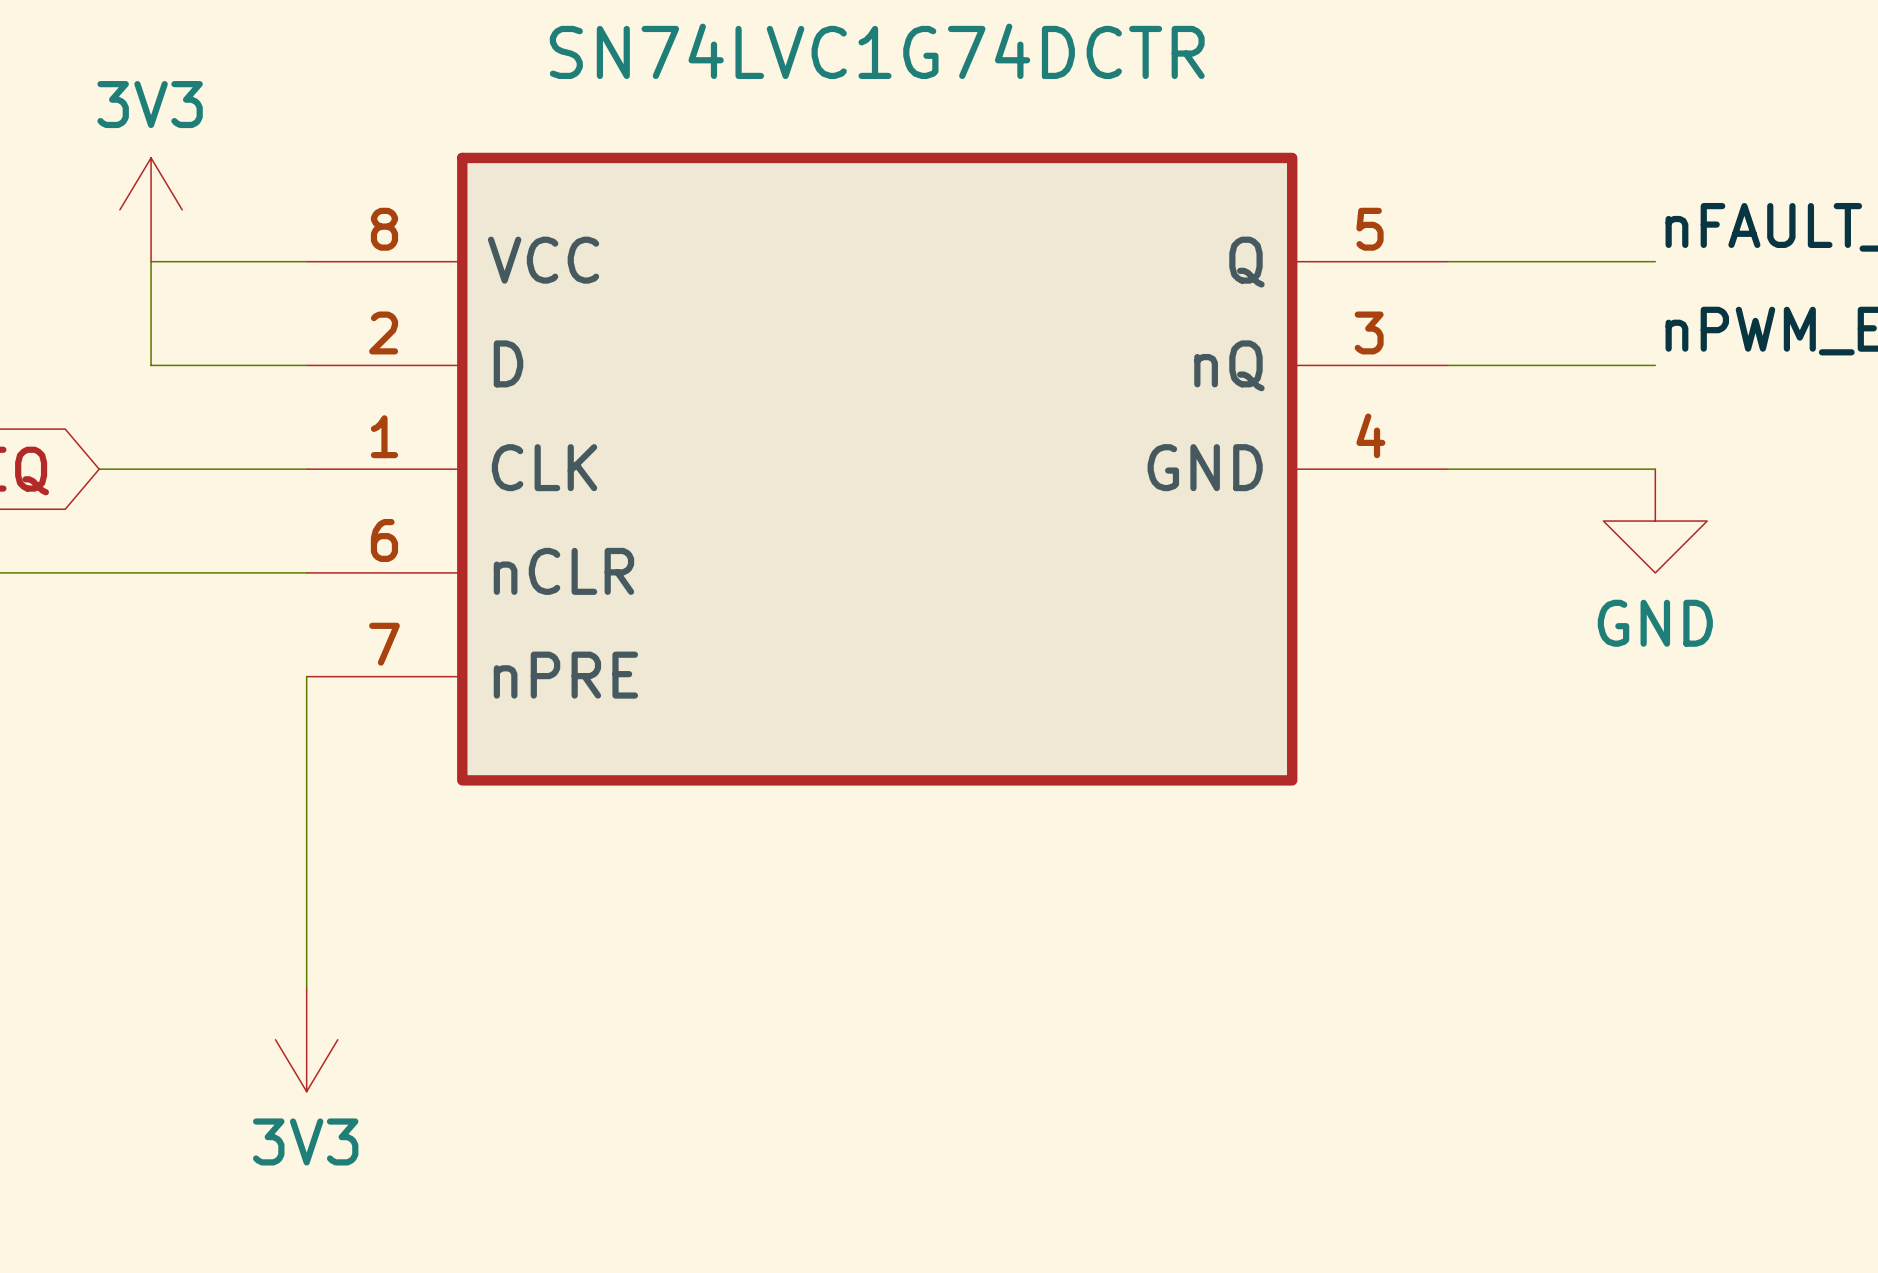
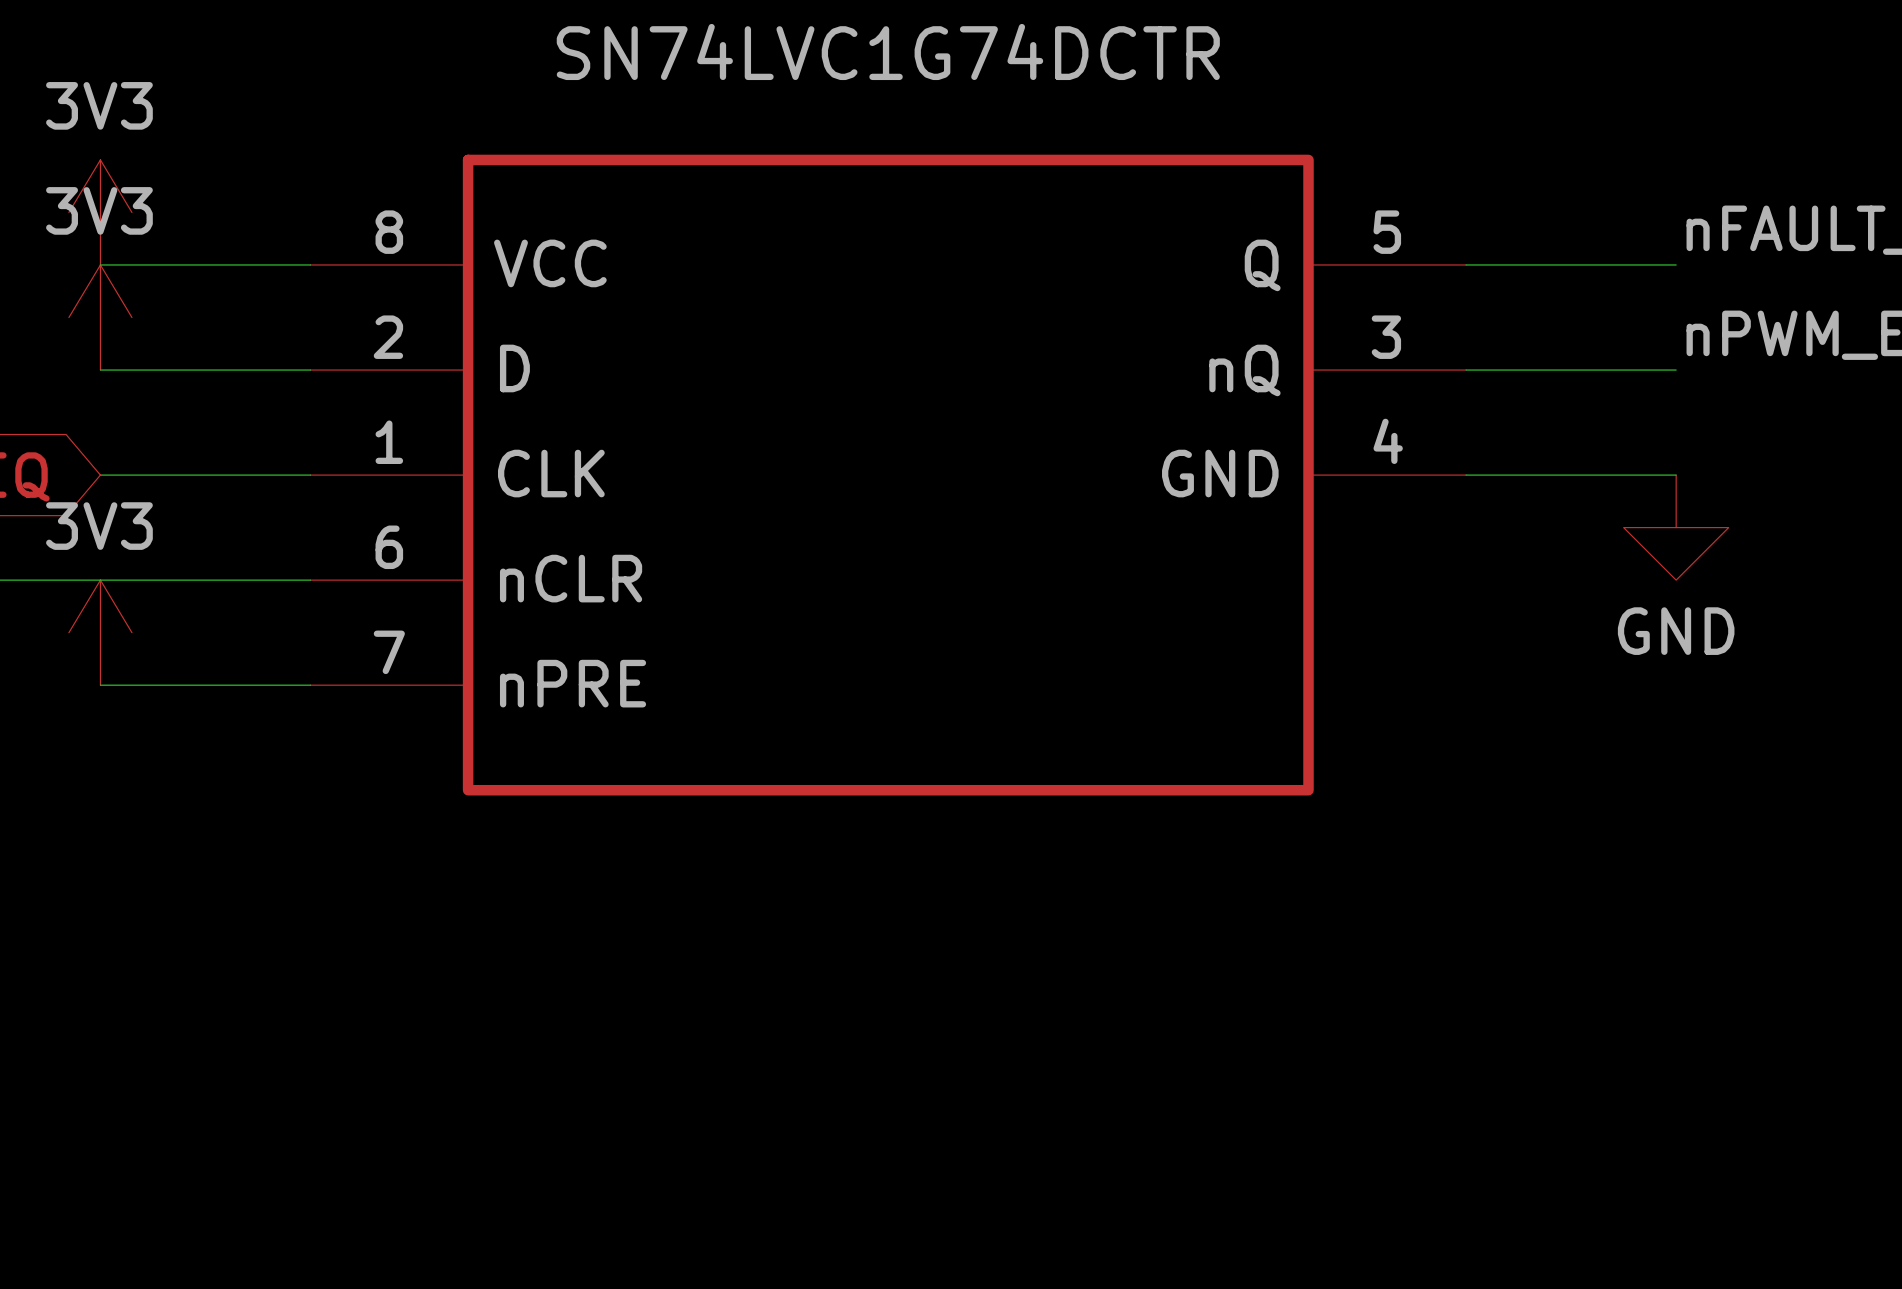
power symbol position: 3V3 (151, 209) -> 3V3 (100, 212)
wire: (151, 261) (151, 365) -> (152, 264) (100, 264)
power symbol: none -> 3V3 (100, 317)
wire: none -> (100, 370) (152, 370)
power symbol: none -> 3V3 (100, 632)
wire: (306, 676) (306, 987) -> (310, 685) (100, 685)
power symbol: 3V3 (306, 1039) -> none

